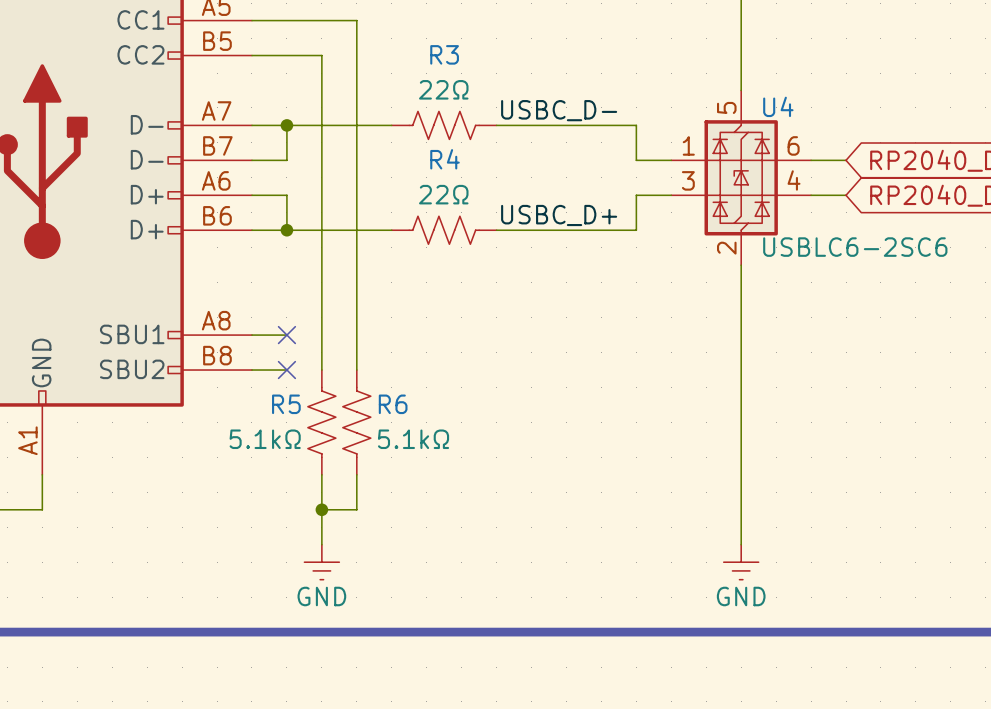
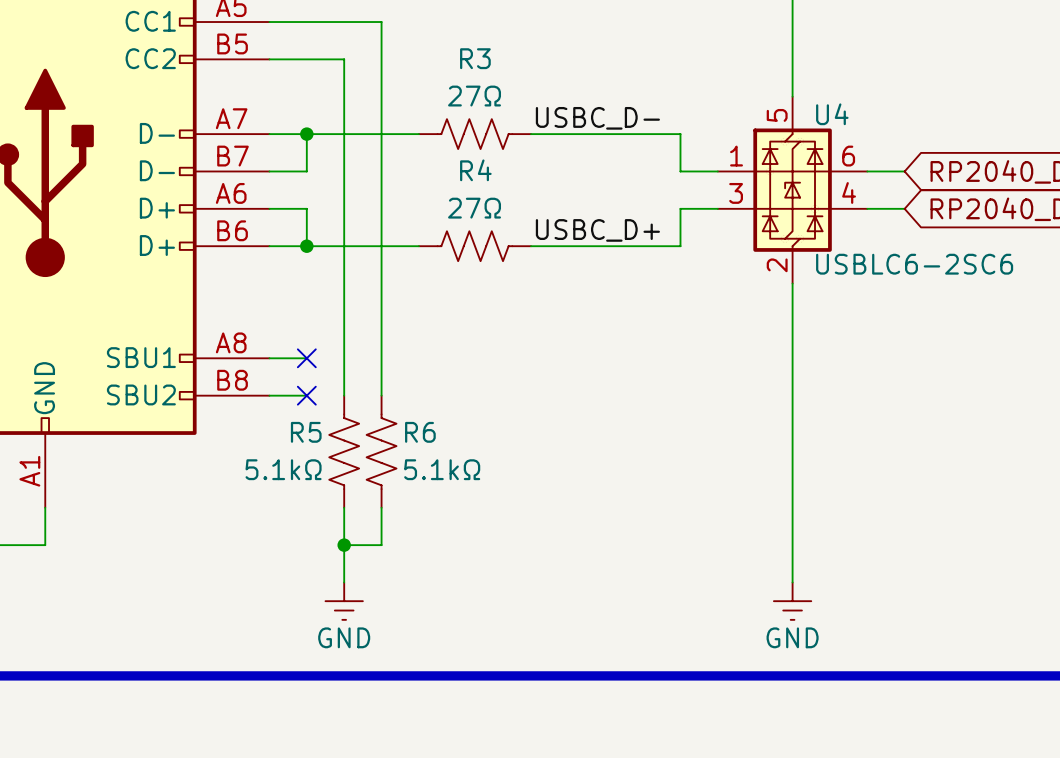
R3 value: 22Ω (443, 89) -> 27Ω (474, 96)
R4 value: 22Ω (443, 194) -> 27Ω (474, 208)

